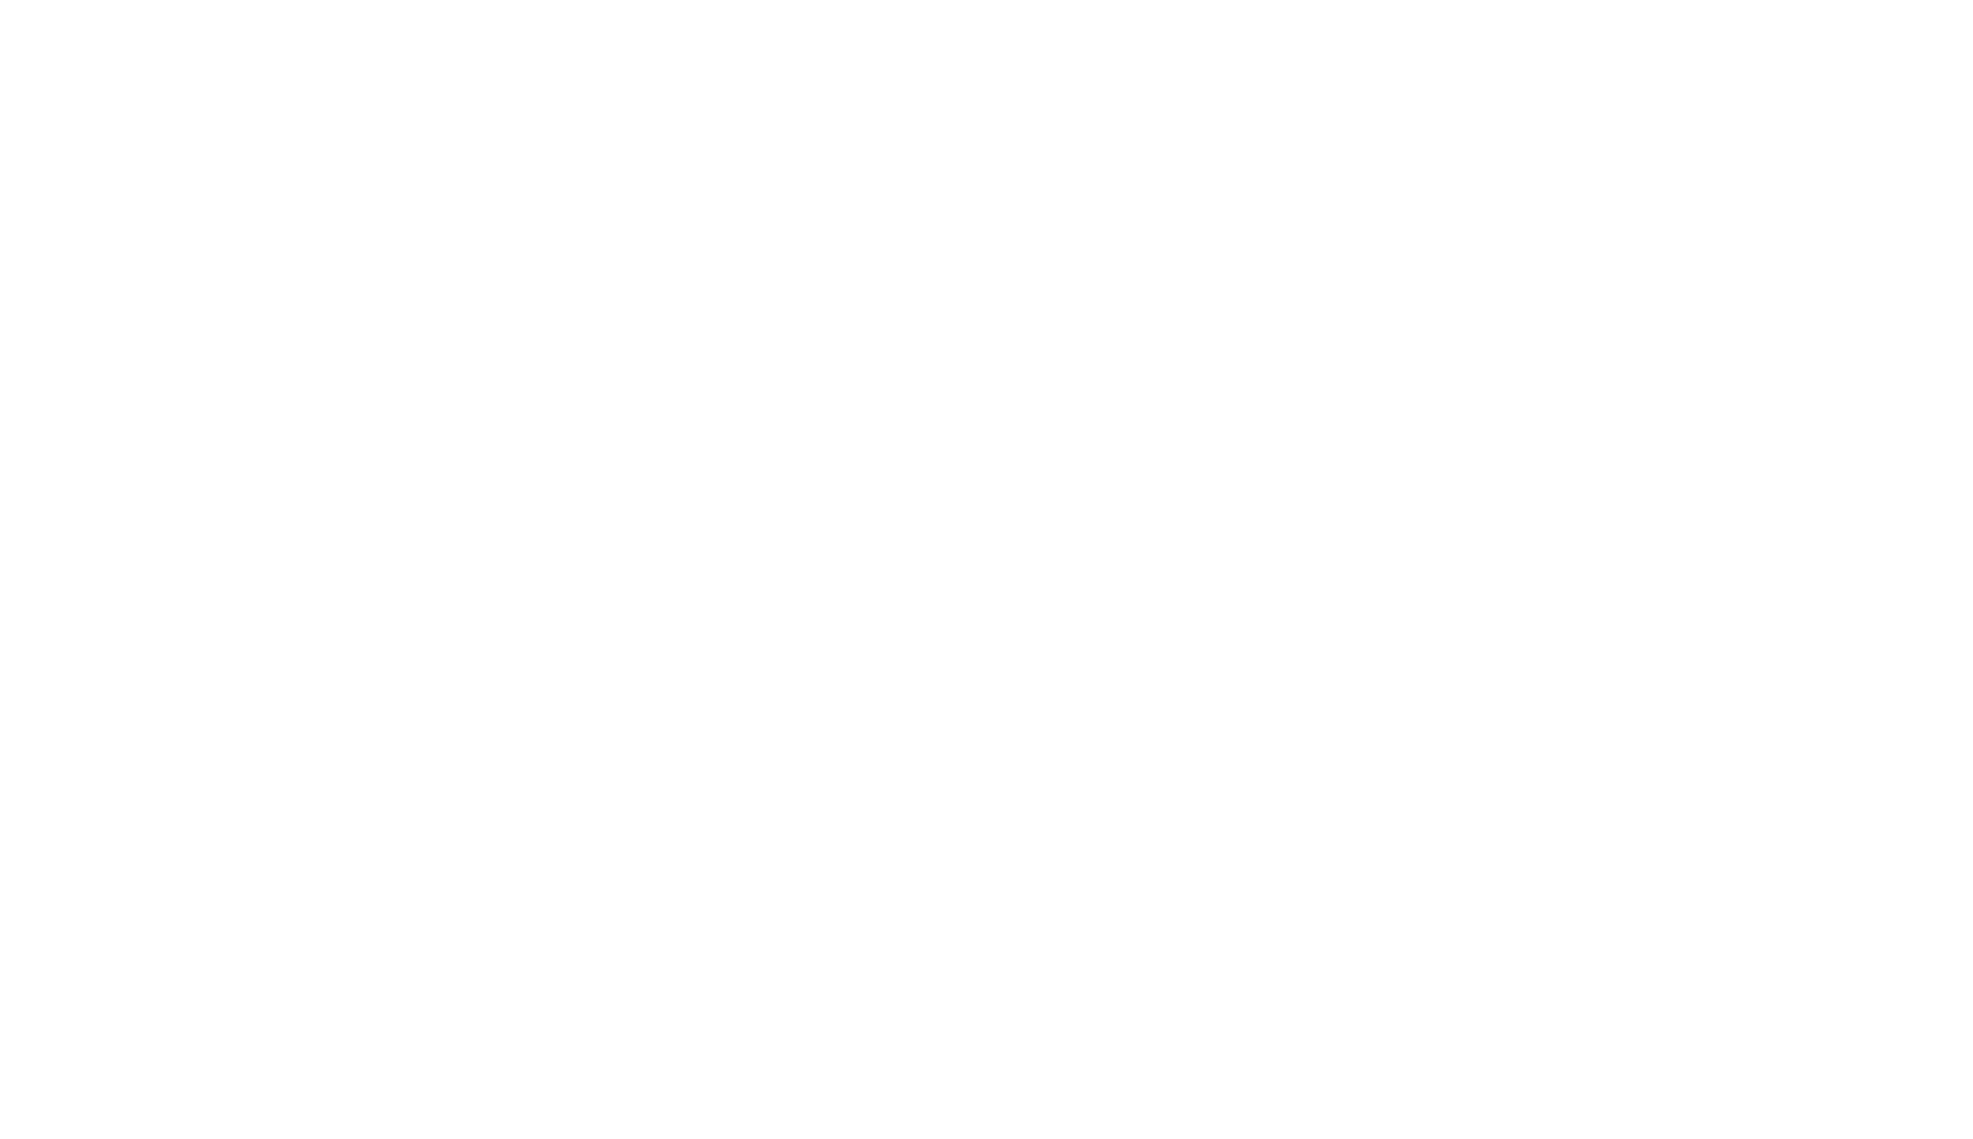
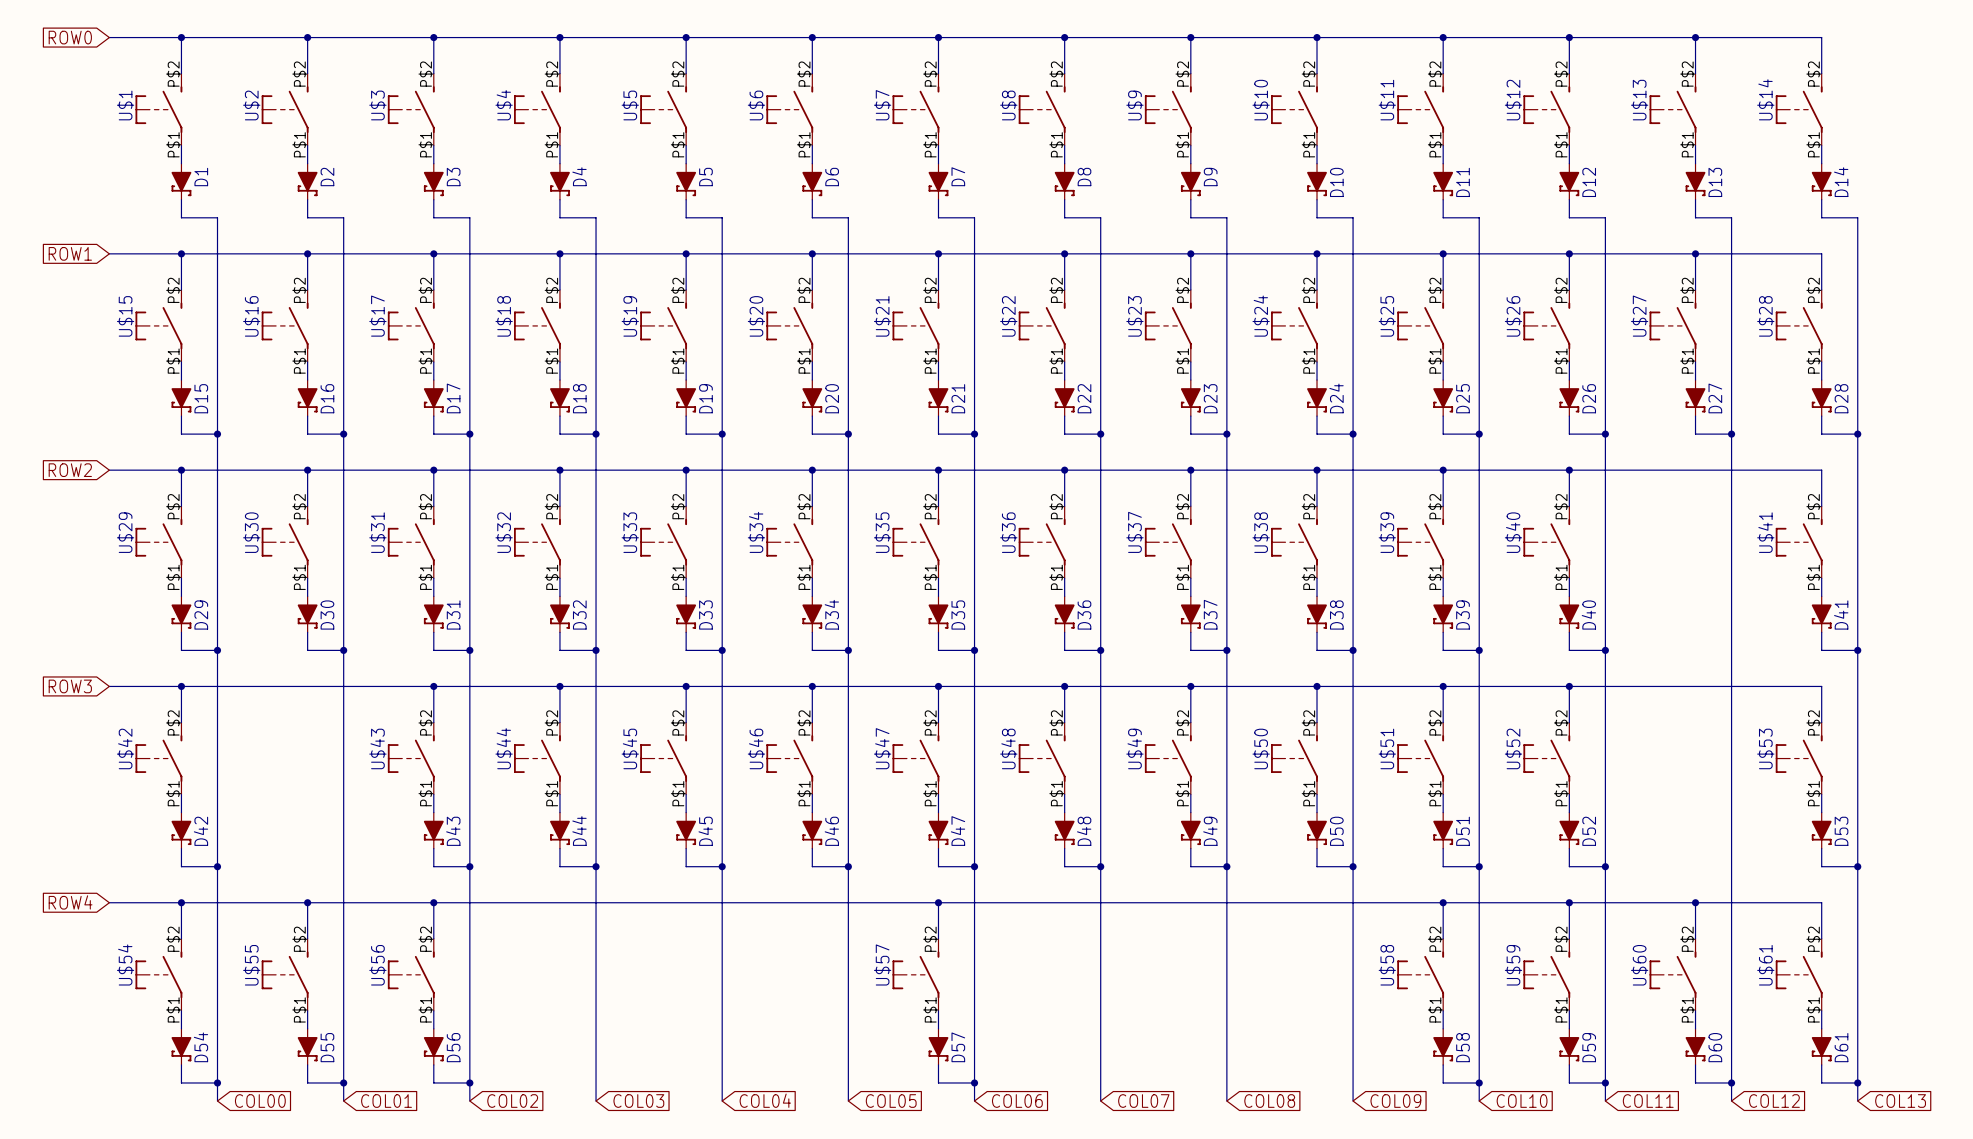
global label: none -> ROW0 (70, 37)
wire: none -> (109, 37) (1821, 37) (1821, 73)
wire: none -> (181, 37) (181, 73)
junction: none -> (181, 37)
wire: none -> (307, 37) (307, 73)
junction: none -> (307, 37)
wire: none -> (433, 37) (433, 73)
junction: none -> (433, 37)
wire: none -> (559, 37) (559, 73)
junction: none -> (559, 37)
wire: none -> (686, 37) (686, 73)
junction: none -> (686, 37)
wire: none -> (812, 37) (812, 73)
junction: none -> (812, 37)
wire: none -> (938, 37) (938, 73)
junction: none -> (938, 37)
wire: none -> (1064, 37) (1064, 73)
junction: none -> (1064, 37)
wire: none -> (1190, 37) (1190, 73)
junction: none -> (1190, 37)
wire: none -> (1317, 37) (1317, 73)
junction: none -> (1317, 37)
wire: none -> (1443, 37) (1443, 73)
junction: none -> (1443, 37)
wire: none -> (1569, 37) (1569, 73)
junction: none -> (1569, 37)
wire: none -> (1695, 37) (1695, 73)
junction: none -> (1695, 37)
U$1: none -> (158, 109)
U$2: none -> (285, 109)
U$3: none -> (411, 109)
U$4: none -> (537, 109)
U$5: none -> (663, 109)
U$6: none -> (789, 109)
U$7: none -> (915, 109)
U$8: none -> (1042, 109)
U$9: none -> (1168, 109)
U$10: none -> (1294, 109)
U$11: none -> (1420, 109)
U$12: none -> (1546, 109)
U$13: none -> (1672, 109)
U$14: none -> (1799, 109)
wire: none -> (181, 145) (181, 163)
wire: none -> (307, 145) (307, 163)
wire: none -> (433, 145) (433, 163)
wire: none -> (559, 145) (559, 163)
wire: none -> (686, 145) (686, 163)
wire: none -> (812, 145) (812, 163)
wire: none -> (938, 145) (938, 163)
wire: none -> (1064, 145) (1064, 163)
wire: none -> (1190, 145) (1190, 163)
wire: none -> (1317, 145) (1317, 163)
wire: none -> (1443, 145) (1443, 163)
wire: none -> (1569, 145) (1569, 163)
wire: none -> (1695, 145) (1695, 163)
wire: none -> (1821, 145) (1821, 163)
D1: none -> (181, 181)
D2: none -> (307, 181)
D3: none -> (433, 181)
D4: none -> (559, 181)
D5: none -> (686, 181)
D6: none -> (812, 181)
D7: none -> (938, 181)
D8: none -> (1064, 181)
D9: none -> (1190, 181)
D10: none -> (1317, 181)
D11: none -> (1443, 181)
D12: none -> (1569, 181)
D13: none -> (1695, 181)
D14: none -> (1821, 181)
wire: none -> (181, 199) (181, 217) (217, 217) (217, 1101)
wire: none -> (307, 199) (307, 217) (343, 217) (343, 1101)
wire: none -> (433, 199) (433, 217) (469, 217) (469, 1101)
wire: none -> (559, 199) (559, 217) (596, 217) (596, 1101)
wire: none -> (686, 199) (686, 217) (722, 217) (722, 1101)
wire: none -> (812, 199) (812, 217) (848, 217) (848, 1101)
wire: none -> (938, 199) (938, 217) (974, 217) (974, 1101)
wire: none -> (1064, 199) (1064, 217) (1100, 217) (1100, 1101)
wire: none -> (1190, 199) (1190, 217) (1226, 217) (1226, 1101)
wire: none -> (1317, 199) (1317, 217) (1353, 217) (1353, 1101)
wire: none -> (1443, 199) (1443, 217) (1479, 217) (1479, 1101)
wire: none -> (1569, 199) (1569, 217) (1605, 217) (1605, 1101)
wire: none -> (1695, 199) (1695, 217) (1731, 217) (1731, 1101)
wire: none -> (1821, 199) (1821, 217) (1857, 217) (1857, 1101)
global label: none -> ROW1 (70, 253)
wire: none -> (109, 253) (1821, 253) (1821, 289)
wire: none -> (181, 253) (181, 289)
junction: none -> (181, 253)
wire: none -> (307, 253) (307, 289)
junction: none -> (307, 253)
wire: none -> (433, 253) (433, 289)
junction: none -> (433, 253)
wire: none -> (559, 253) (559, 289)
junction: none -> (559, 253)
wire: none -> (686, 253) (686, 289)
junction: none -> (686, 253)
wire: none -> (812, 253) (812, 289)
junction: none -> (812, 253)
wire: none -> (938, 253) (938, 289)
junction: none -> (938, 253)
wire: none -> (1064, 253) (1064, 289)
junction: none -> (1064, 253)
wire: none -> (1190, 253) (1190, 289)
junction: none -> (1190, 253)
wire: none -> (1317, 253) (1317, 289)
junction: none -> (1317, 253)
wire: none -> (1443, 253) (1443, 289)
junction: none -> (1443, 253)
wire: none -> (1569, 253) (1569, 289)
junction: none -> (1569, 253)
wire: none -> (1695, 253) (1695, 289)
junction: none -> (1695, 253)
U$15: none -> (158, 325)
U$16: none -> (285, 325)
U$17: none -> (411, 325)
U$18: none -> (537, 325)
U$19: none -> (663, 325)
U$20: none -> (789, 325)
U$21: none -> (915, 325)
U$22: none -> (1042, 325)
U$23: none -> (1168, 325)
U$24: none -> (1294, 325)
U$25: none -> (1420, 325)
U$26: none -> (1546, 325)
U$27: none -> (1672, 325)
U$28: none -> (1799, 325)
wire: none -> (181, 362) (181, 380)
wire: none -> (307, 362) (307, 380)
wire: none -> (433, 362) (433, 380)
wire: none -> (559, 362) (559, 380)
wire: none -> (686, 362) (686, 380)
wire: none -> (812, 362) (812, 380)
wire: none -> (938, 362) (938, 380)
wire: none -> (1064, 362) (1064, 380)
wire: none -> (1190, 362) (1190, 380)
wire: none -> (1317, 362) (1317, 380)
wire: none -> (1443, 362) (1443, 380)
wire: none -> (1569, 362) (1569, 380)
wire: none -> (1695, 362) (1695, 380)
wire: none -> (1821, 362) (1821, 380)
D15: none -> (181, 398)
D16: none -> (307, 398)
D17: none -> (433, 398)
D18: none -> (559, 398)
D19: none -> (686, 398)
D20: none -> (812, 398)
D21: none -> (938, 398)
D22: none -> (1064, 398)
D23: none -> (1190, 398)
D24: none -> (1317, 398)
D25: none -> (1443, 398)
D26: none -> (1569, 398)
D27: none -> (1695, 398)
D28: none -> (1821, 398)
wire: none -> (181, 416) (181, 434) (217, 434)
wire: none -> (307, 416) (307, 434) (343, 434)
wire: none -> (433, 416) (433, 434) (469, 434)
wire: none -> (559, 416) (559, 434) (596, 434)
wire: none -> (686, 416) (686, 434) (722, 434)
wire: none -> (812, 416) (812, 434) (848, 434)
wire: none -> (938, 416) (938, 434) (974, 434)
wire: none -> (1064, 416) (1064, 434) (1100, 434)
wire: none -> (1190, 416) (1190, 434) (1226, 434)
wire: none -> (1317, 416) (1317, 434) (1353, 434)
wire: none -> (1443, 416) (1443, 434) (1479, 434)
wire: none -> (1569, 416) (1569, 434) (1605, 434)
wire: none -> (1695, 416) (1695, 434) (1731, 434)
wire: none -> (1821, 416) (1821, 434) (1857, 434)
junction: none -> (217, 434)
junction: none -> (343, 434)
junction: none -> (469, 434)
junction: none -> (596, 434)
junction: none -> (722, 434)
junction: none -> (848, 434)
junction: none -> (974, 434)
junction: none -> (1100, 434)
junction: none -> (1226, 434)
junction: none -> (1353, 434)
junction: none -> (1479, 434)
junction: none -> (1605, 434)
junction: none -> (1731, 434)
junction: none -> (1857, 434)
global label: none -> ROW2 (70, 470)
wire: none -> (109, 470) (1821, 470) (1821, 506)
wire: none -> (181, 470) (181, 506)
junction: none -> (181, 470)
wire: none -> (307, 470) (307, 506)
junction: none -> (307, 470)
wire: none -> (433, 470) (433, 506)
junction: none -> (433, 470)
wire: none -> (559, 470) (559, 506)
junction: none -> (559, 470)
wire: none -> (686, 470) (686, 506)
junction: none -> (686, 470)
wire: none -> (812, 470) (812, 506)
junction: none -> (812, 470)
wire: none -> (938, 470) (938, 506)
junction: none -> (938, 470)
wire: none -> (1064, 470) (1064, 506)
junction: none -> (1064, 470)
wire: none -> (1190, 470) (1190, 506)
junction: none -> (1190, 470)
wire: none -> (1317, 470) (1317, 506)
junction: none -> (1317, 470)
wire: none -> (1443, 470) (1443, 506)
junction: none -> (1443, 470)
wire: none -> (1569, 470) (1569, 506)
junction: none -> (1569, 470)
U$29: none -> (158, 542)
U$30: none -> (285, 542)
U$31: none -> (411, 542)
U$32: none -> (537, 542)
U$33: none -> (663, 542)
U$34: none -> (789, 542)
U$35: none -> (915, 542)
U$36: none -> (1042, 542)
U$37: none -> (1168, 542)
U$38: none -> (1294, 542)
U$39: none -> (1420, 542)
U$40: none -> (1546, 542)
U$41: none -> (1799, 542)
wire: none -> (181, 578) (181, 596)
wire: none -> (307, 578) (307, 596)
wire: none -> (433, 578) (433, 596)
wire: none -> (559, 578) (559, 596)
wire: none -> (686, 578) (686, 596)
wire: none -> (812, 578) (812, 596)
wire: none -> (938, 578) (938, 596)
wire: none -> (1064, 578) (1064, 596)
wire: none -> (1190, 578) (1190, 596)
wire: none -> (1317, 578) (1317, 596)
wire: none -> (1443, 578) (1443, 596)
wire: none -> (1569, 578) (1569, 596)
wire: none -> (1821, 578) (1821, 596)
D29: none -> (181, 614)
D30: none -> (307, 614)
D31: none -> (433, 614)
D32: none -> (559, 614)
D33: none -> (686, 614)
D34: none -> (812, 614)
D35: none -> (938, 614)
D36: none -> (1064, 614)
D37: none -> (1190, 614)
D38: none -> (1317, 614)
D39: none -> (1443, 614)
D40: none -> (1569, 614)
D41: none -> (1821, 614)
wire: none -> (181, 632) (181, 650) (217, 650)
wire: none -> (307, 632) (307, 650) (343, 650)
wire: none -> (433, 632) (433, 650) (469, 650)
wire: none -> (559, 632) (559, 650) (596, 650)
wire: none -> (686, 632) (686, 650) (722, 650)
wire: none -> (812, 632) (812, 650) (848, 650)
wire: none -> (938, 632) (938, 650) (974, 650)
wire: none -> (1064, 632) (1064, 650) (1100, 650)
wire: none -> (1190, 632) (1190, 650) (1226, 650)
wire: none -> (1317, 632) (1317, 650) (1353, 650)
wire: none -> (1443, 632) (1443, 650) (1479, 650)
wire: none -> (1569, 632) (1569, 650) (1605, 650)
wire: none -> (1821, 632) (1821, 650) (1857, 650)
junction: none -> (217, 650)
junction: none -> (343, 650)
junction: none -> (469, 650)
junction: none -> (596, 650)
junction: none -> (722, 650)
junction: none -> (848, 650)
junction: none -> (974, 650)
junction: none -> (1100, 650)
junction: none -> (1226, 650)
junction: none -> (1353, 650)
junction: none -> (1479, 650)
junction: none -> (1605, 650)
junction: none -> (1857, 650)
global label: none -> ROW3 (70, 686)
wire: none -> (109, 686) (1821, 686) (1821, 722)
wire: none -> (181, 686) (181, 722)
junction: none -> (181, 686)
wire: none -> (433, 686) (433, 722)
junction: none -> (433, 686)
wire: none -> (559, 686) (559, 722)
junction: none -> (559, 686)
wire: none -> (686, 686) (686, 722)
junction: none -> (686, 686)
wire: none -> (812, 686) (812, 722)
junction: none -> (812, 686)
wire: none -> (938, 686) (938, 722)
junction: none -> (938, 686)
wire: none -> (1064, 686) (1064, 722)
junction: none -> (1064, 686)
wire: none -> (1190, 686) (1190, 722)
junction: none -> (1190, 686)
wire: none -> (1317, 686) (1317, 722)
junction: none -> (1317, 686)
wire: none -> (1443, 686) (1443, 722)
junction: none -> (1443, 686)
wire: none -> (1569, 686) (1569, 722)
junction: none -> (1569, 686)
U$42: none -> (158, 758)
U$43: none -> (411, 758)
U$44: none -> (537, 758)
U$45: none -> (663, 758)
U$46: none -> (789, 758)
U$47: none -> (915, 758)
U$48: none -> (1042, 758)
U$49: none -> (1168, 758)
U$50: none -> (1294, 758)
U$51: none -> (1420, 758)
U$52: none -> (1546, 758)
U$53: none -> (1799, 758)
wire: none -> (181, 794) (181, 812)
wire: none -> (433, 794) (433, 812)
wire: none -> (559, 794) (559, 812)
wire: none -> (686, 794) (686, 812)
wire: none -> (812, 794) (812, 812)
wire: none -> (938, 794) (938, 812)
wire: none -> (1064, 794) (1064, 812)
wire: none -> (1190, 794) (1190, 812)
wire: none -> (1317, 794) (1317, 812)
wire: none -> (1443, 794) (1443, 812)
wire: none -> (1569, 794) (1569, 812)
wire: none -> (1821, 794) (1821, 812)
D42: none -> (181, 830)
D43: none -> (433, 830)
D44: none -> (559, 830)
D45: none -> (686, 830)
D46: none -> (812, 830)
D47: none -> (938, 830)
D48: none -> (1064, 830)
D49: none -> (1190, 830)
D50: none -> (1317, 830)
D51: none -> (1443, 830)
D52: none -> (1569, 830)
D53: none -> (1821, 830)
wire: none -> (181, 848) (181, 866) (217, 866)
wire: none -> (433, 848) (433, 866) (469, 866)
wire: none -> (559, 848) (559, 866) (596, 866)
wire: none -> (686, 848) (686, 866) (722, 866)
wire: none -> (812, 848) (812, 866) (848, 866)
wire: none -> (938, 848) (938, 866) (974, 866)
wire: none -> (1064, 848) (1064, 866) (1100, 866)
wire: none -> (1190, 848) (1190, 866) (1226, 866)
wire: none -> (1317, 848) (1317, 866) (1353, 866)
wire: none -> (1443, 848) (1443, 866) (1479, 866)
wire: none -> (1569, 848) (1569, 866) (1605, 866)
wire: none -> (1821, 848) (1821, 866) (1857, 866)
junction: none -> (217, 866)
junction: none -> (469, 866)
junction: none -> (596, 866)
junction: none -> (722, 866)
junction: none -> (848, 866)
junction: none -> (974, 866)
junction: none -> (1100, 866)
junction: none -> (1226, 866)
junction: none -> (1353, 866)
junction: none -> (1479, 866)
junction: none -> (1605, 866)
junction: none -> (1857, 866)
global label: none -> ROW4 (70, 902)
wire: none -> (109, 902) (1821, 902) (1821, 938)
wire: none -> (181, 902) (181, 938)
junction: none -> (181, 902)
wire: none -> (307, 902) (307, 938)
junction: none -> (307, 902)
wire: none -> (433, 902) (433, 938)
junction: none -> (433, 902)
wire: none -> (938, 902) (938, 938)
junction: none -> (938, 902)
wire: none -> (1443, 902) (1443, 938)
junction: none -> (1443, 902)
wire: none -> (1569, 902) (1569, 938)
junction: none -> (1569, 902)
wire: none -> (1695, 902) (1695, 938)
junction: none -> (1695, 902)
U$54: none -> (158, 974)
U$55: none -> (285, 974)
U$56: none -> (411, 974)
U$57: none -> (915, 974)
U$58: none -> (1420, 974)
U$59: none -> (1546, 974)
U$60: none -> (1672, 974)
U$61: none -> (1799, 974)
wire: none -> (181, 1010) (181, 1028)
wire: none -> (307, 1010) (307, 1028)
wire: none -> (433, 1010) (433, 1028)
wire: none -> (938, 1010) (938, 1028)
wire: none -> (1443, 1010) (1443, 1028)
wire: none -> (1569, 1010) (1569, 1028)
wire: none -> (1695, 1010) (1695, 1028)
wire: none -> (1821, 1010) (1821, 1028)
D54: none -> (181, 1046)
D55: none -> (307, 1046)
D56: none -> (433, 1046)
D57: none -> (938, 1046)
D58: none -> (1443, 1046)
D59: none -> (1569, 1046)
D60: none -> (1695, 1046)
D61: none -> (1821, 1046)
wire: none -> (181, 1064) (181, 1082) (217, 1082)
wire: none -> (307, 1064) (307, 1082) (343, 1082)
wire: none -> (433, 1064) (433, 1082) (469, 1082)
wire: none -> (938, 1064) (938, 1082) (974, 1082)
wire: none -> (1443, 1064) (1443, 1082) (1479, 1082)
wire: none -> (1569, 1064) (1569, 1082) (1605, 1082)
wire: none -> (1695, 1064) (1695, 1082) (1731, 1082)
wire: none -> (1821, 1064) (1821, 1082) (1857, 1082)
junction: none -> (217, 1082)
junction: none -> (343, 1082)
junction: none -> (469, 1082)
junction: none -> (974, 1082)
junction: none -> (1479, 1082)
junction: none -> (1605, 1082)
junction: none -> (1731, 1082)
junction: none -> (1857, 1082)
global label: none -> COL00 (260, 1101)
global label: none -> COL01 (386, 1101)
global label: none -> COL02 (512, 1101)
global label: none -> COL03 (638, 1101)
global label: none -> COL04 (765, 1100)
global label: none -> COL05 (891, 1101)
global label: none -> COL06 (1017, 1101)
global label: none -> COL07 (1143, 1101)
global label: none -> COL08 (1269, 1101)
global label: none -> COL09 (1395, 1101)
global label: none -> COL10 (1522, 1101)
global label: none -> COL11 (1648, 1101)
global label: none -> COL12 (1774, 1101)
global label: none -> COL13 (1900, 1101)

